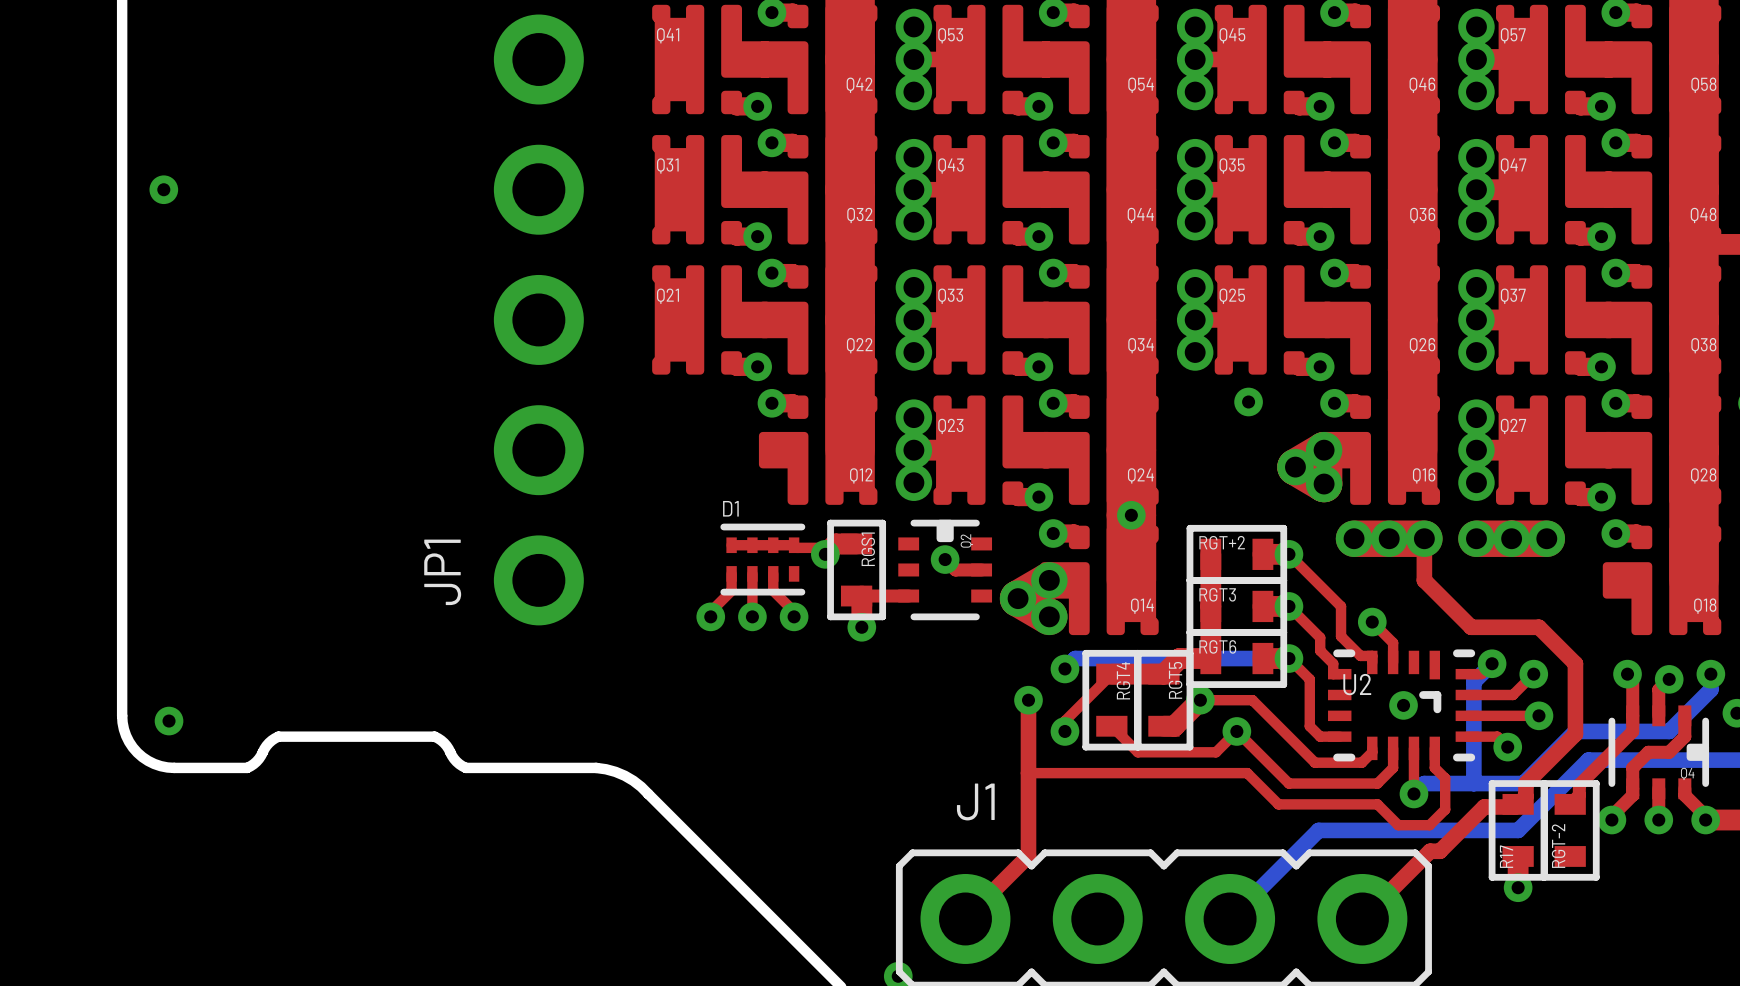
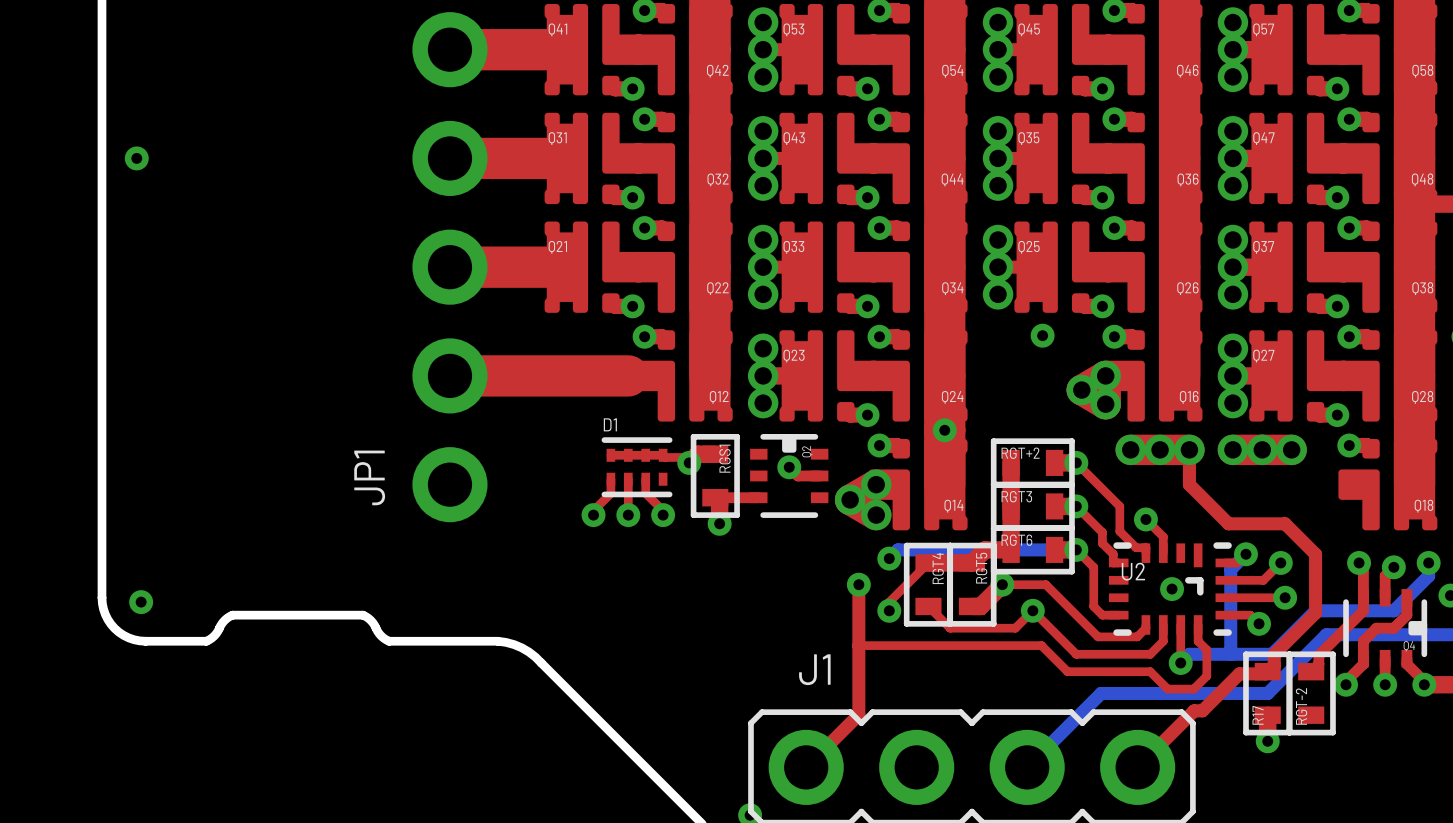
top track: none -> (449, 49) (567, 49)
top track: none -> (449, 158) (567, 158)
top track: none -> (449, 267) (567, 267)
top track: none -> (449, 375) (666, 375)

